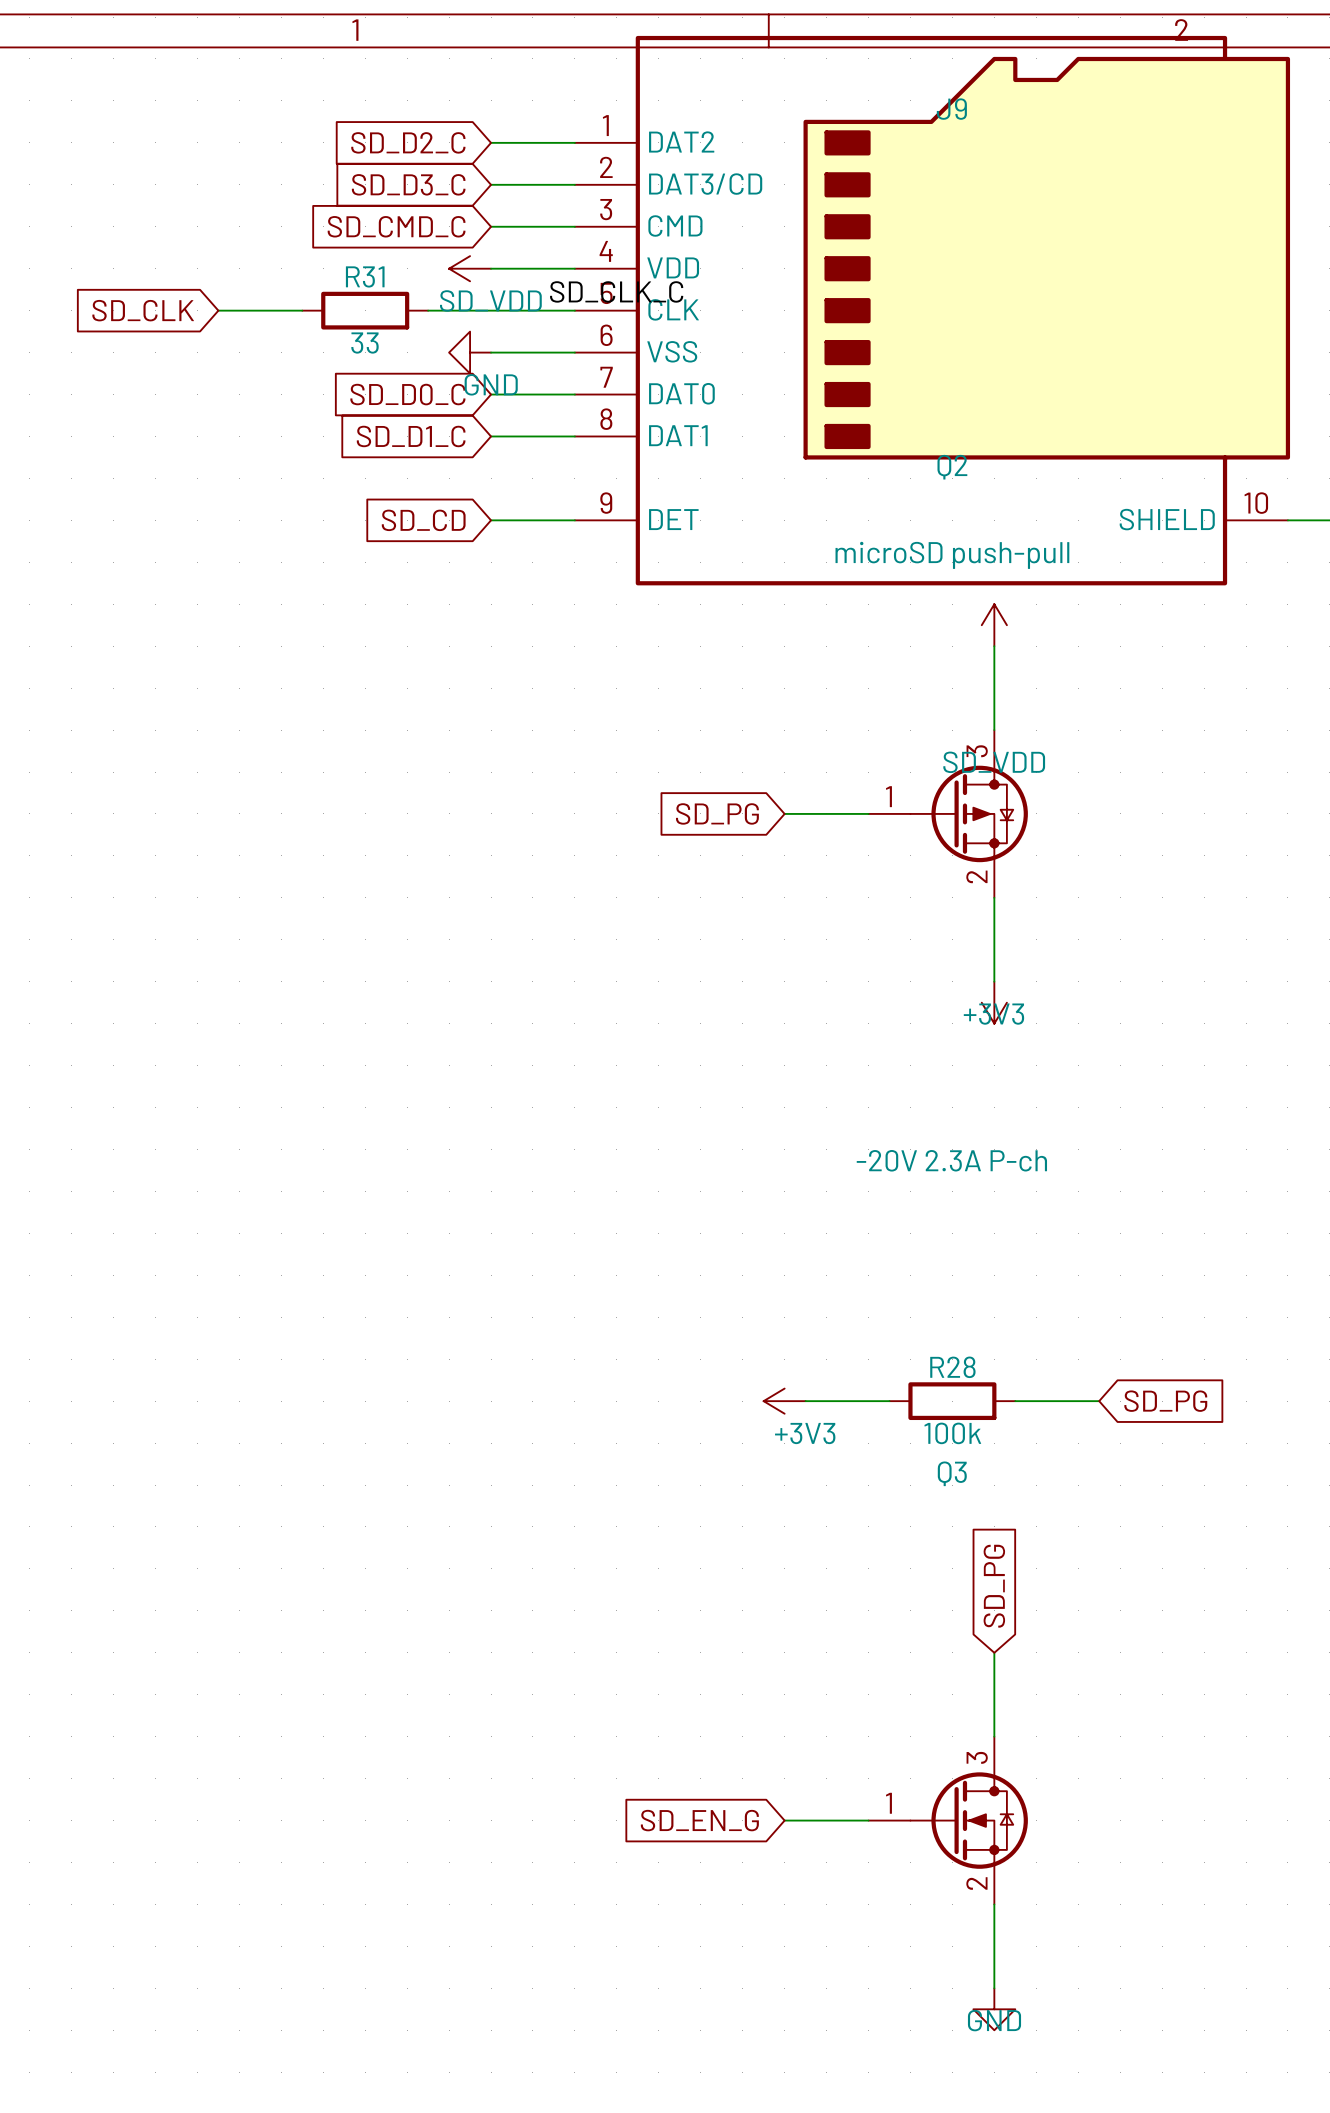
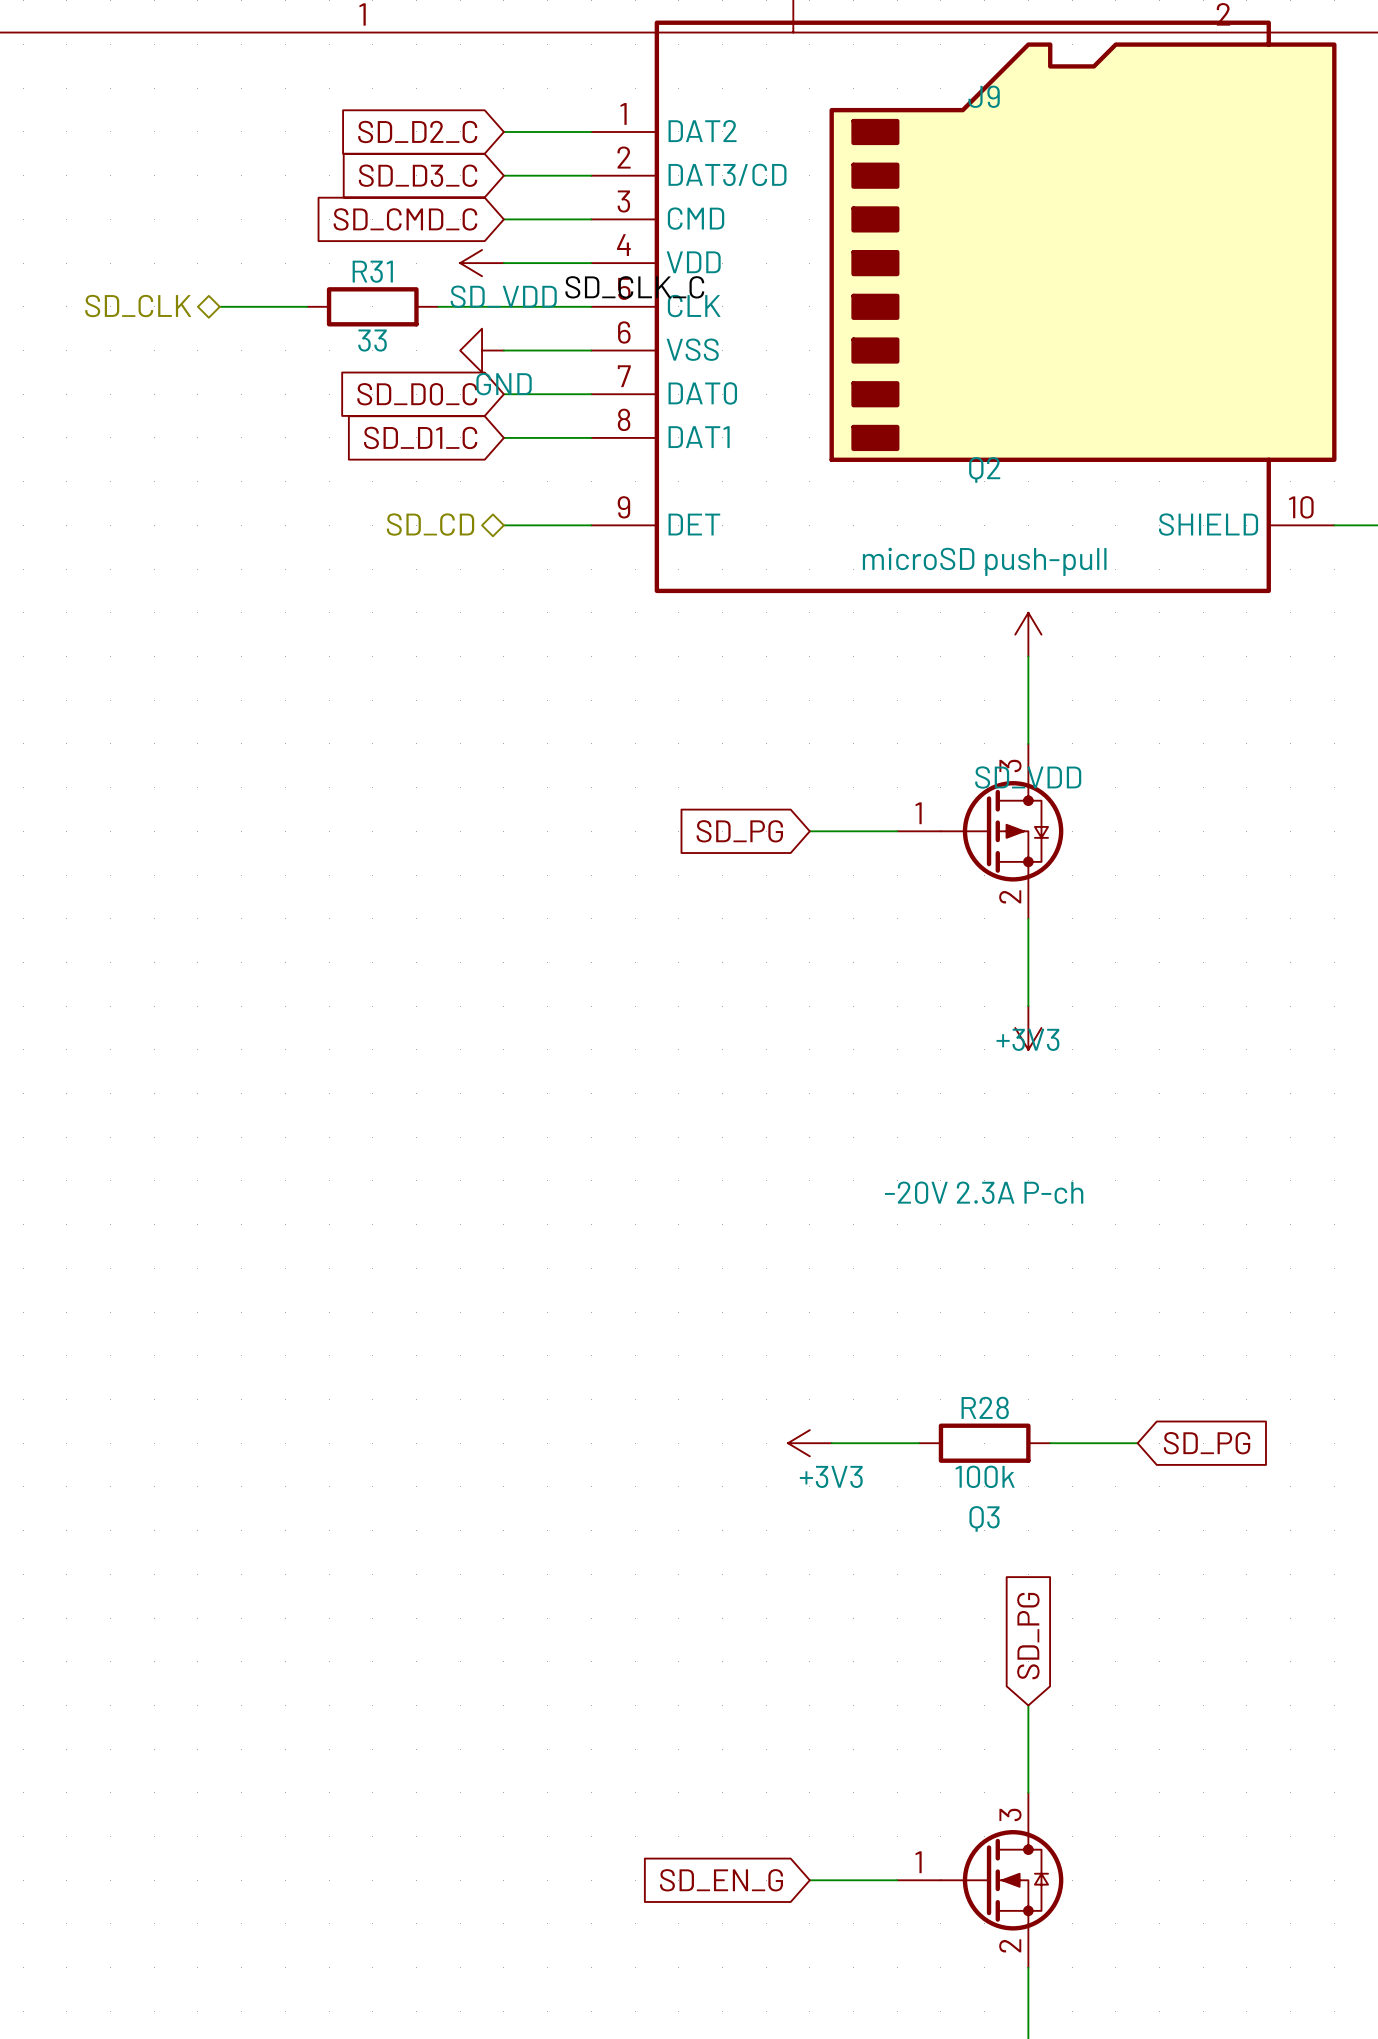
hierarchical label: none -> SD_CLK (138, 306)
global label: SD_CLK (143, 310) -> none
hierarchical label: none -> SD_CD (430, 524)
global label: SD_CD (423, 520) -> none

